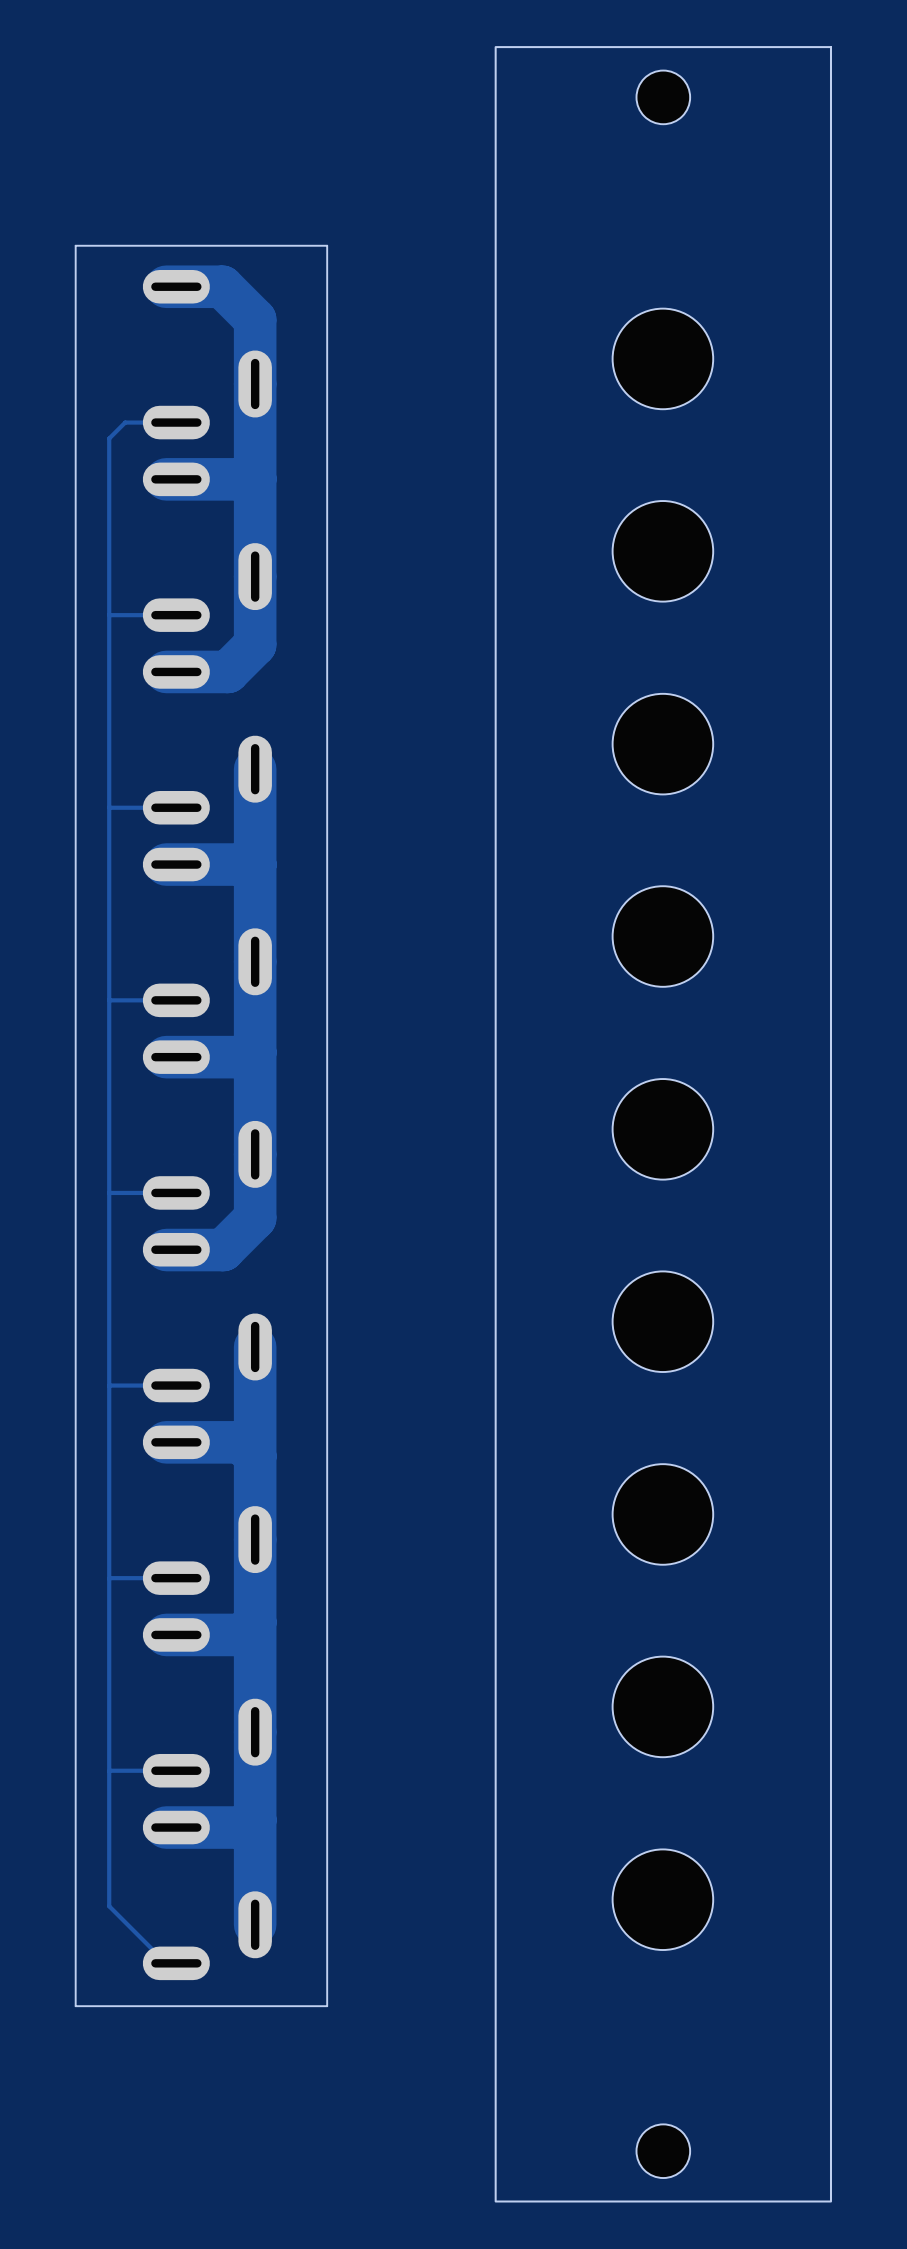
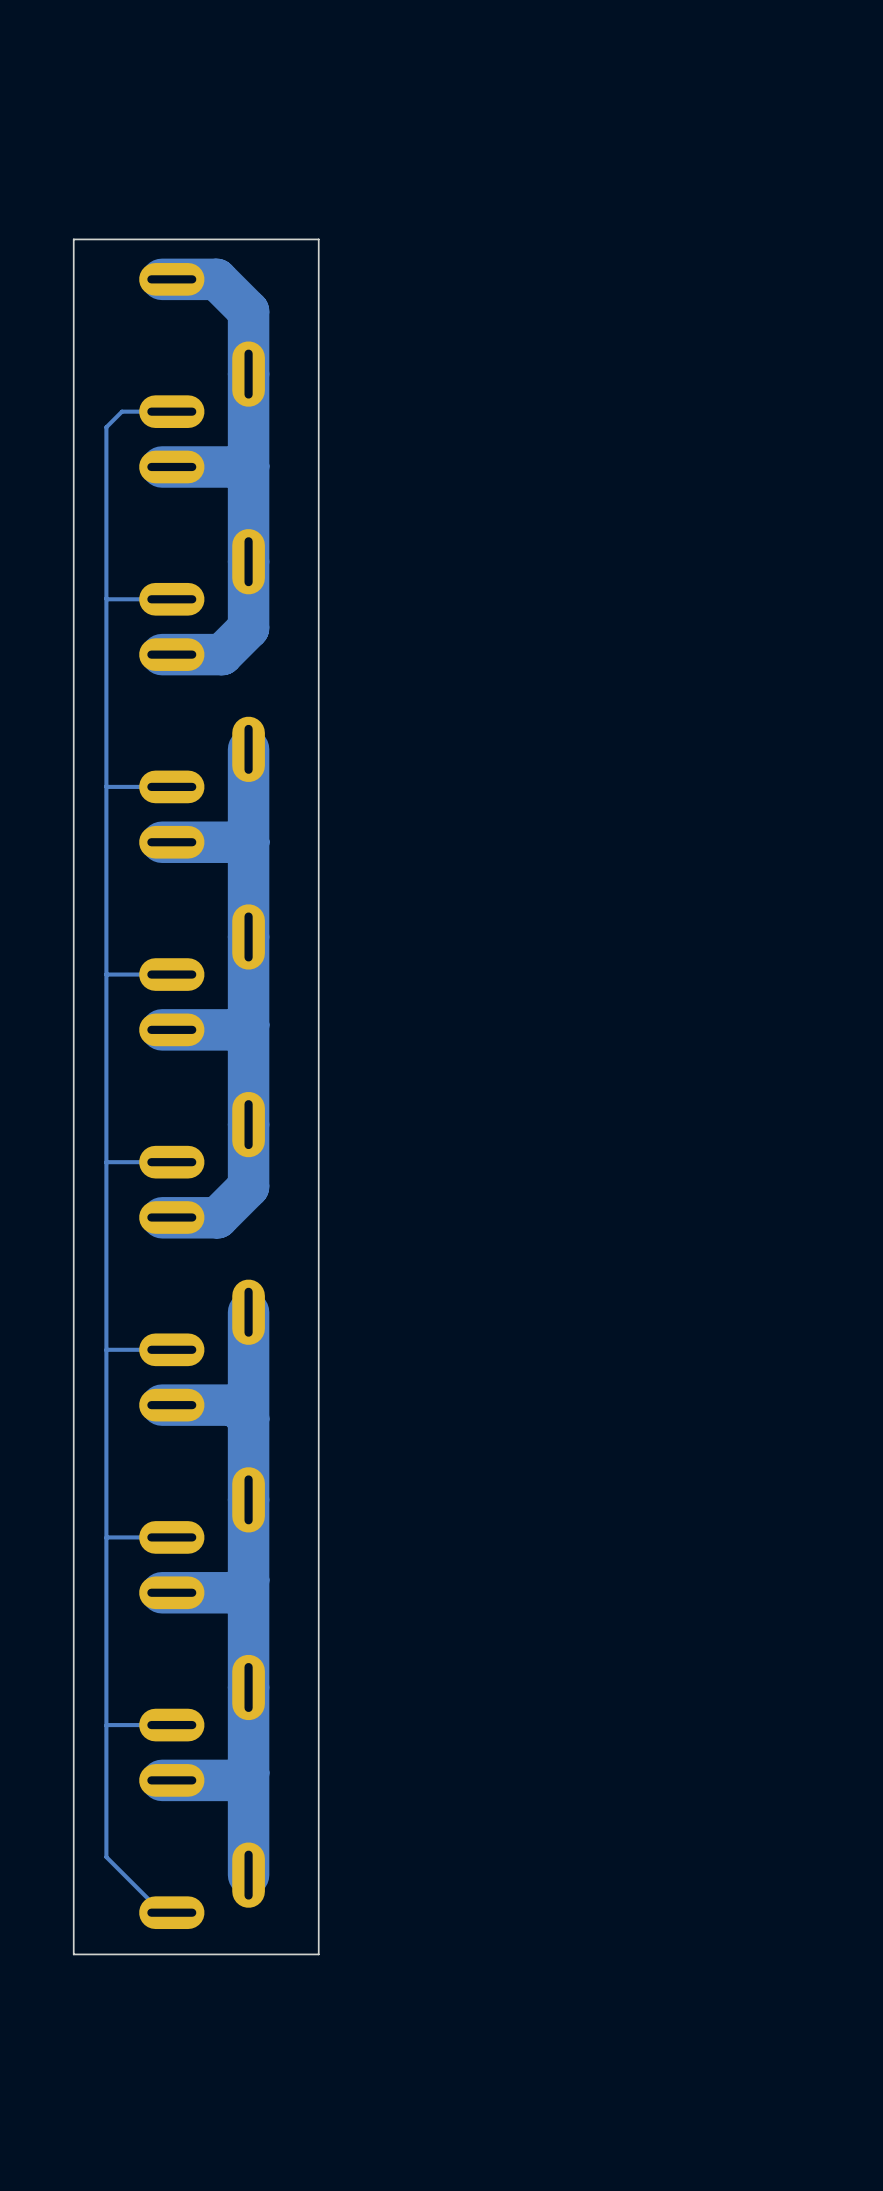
part: (662, 358) -> none
part: (662, 551) -> none
part: (662, 744) -> none
part: (662, 936) -> none
part: (663, 1124) -> none
part: (662, 1129) -> none
part: (662, 1321) -> none
part: (662, 1514) -> none
part: (662, 1706) -> none
part: (662, 1899) -> none

